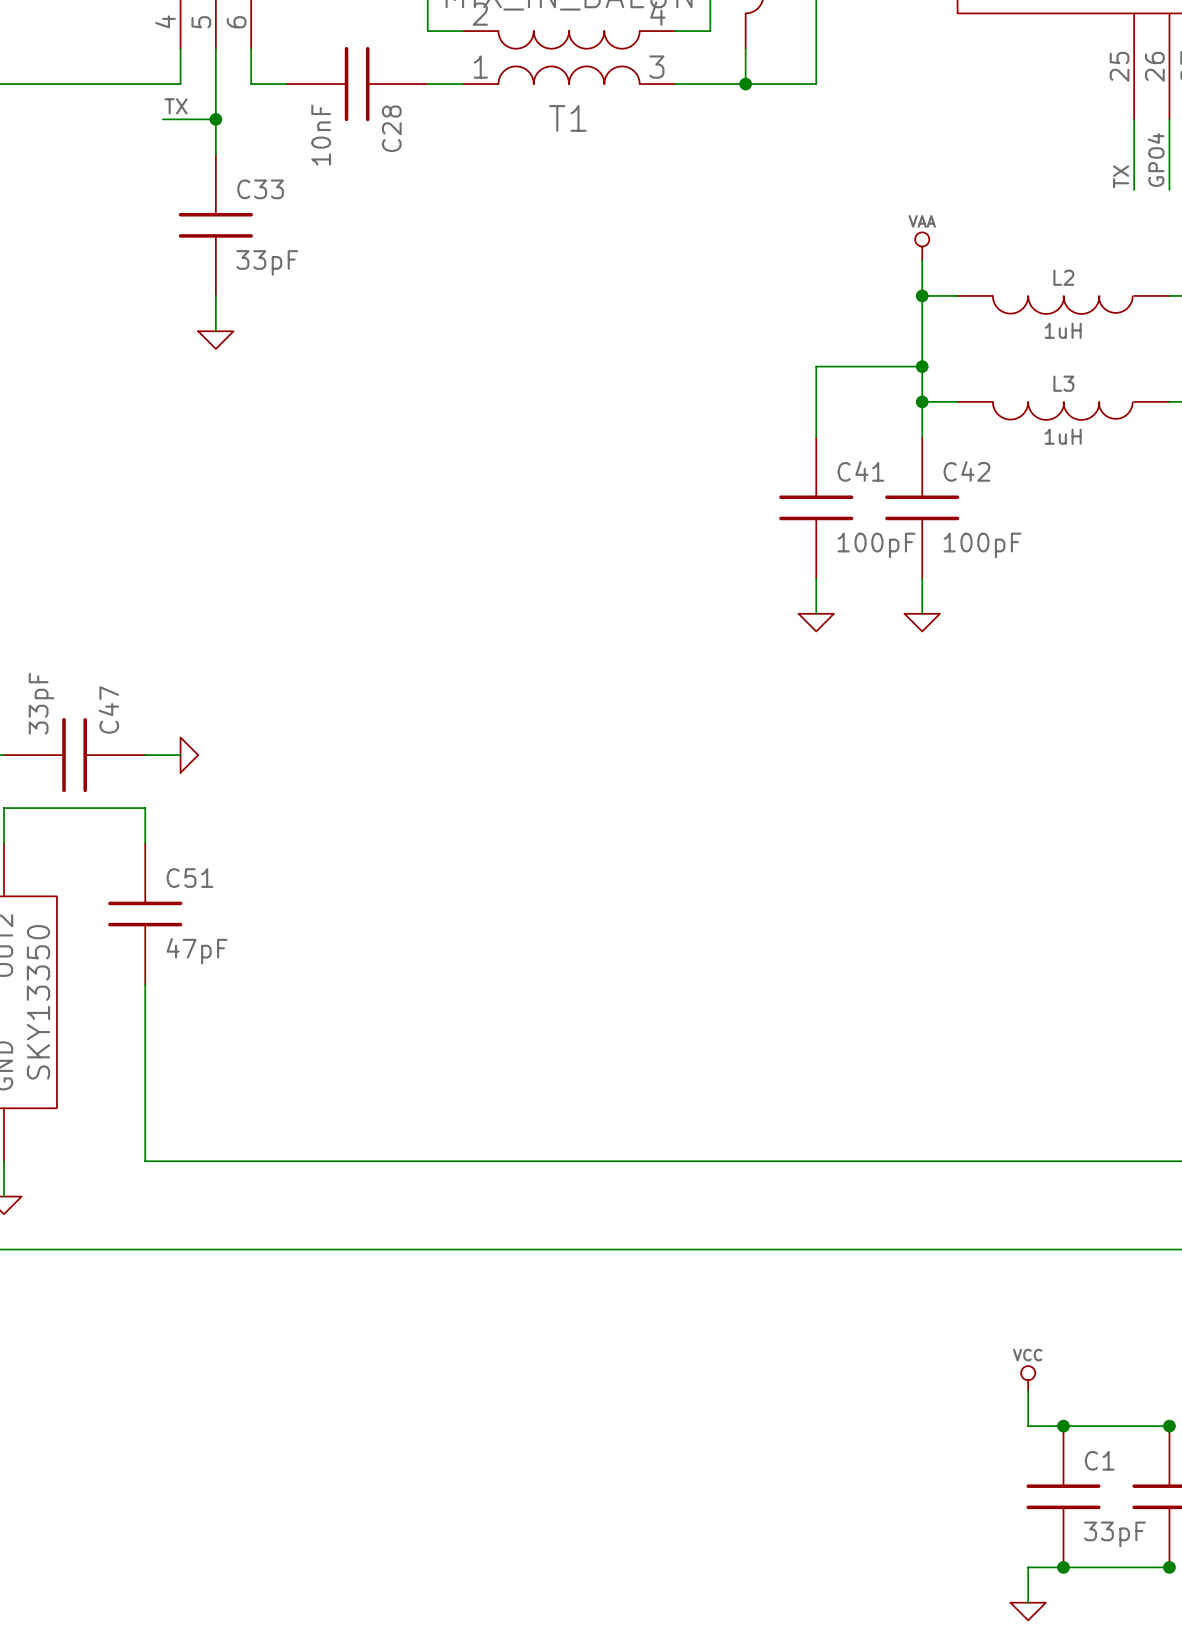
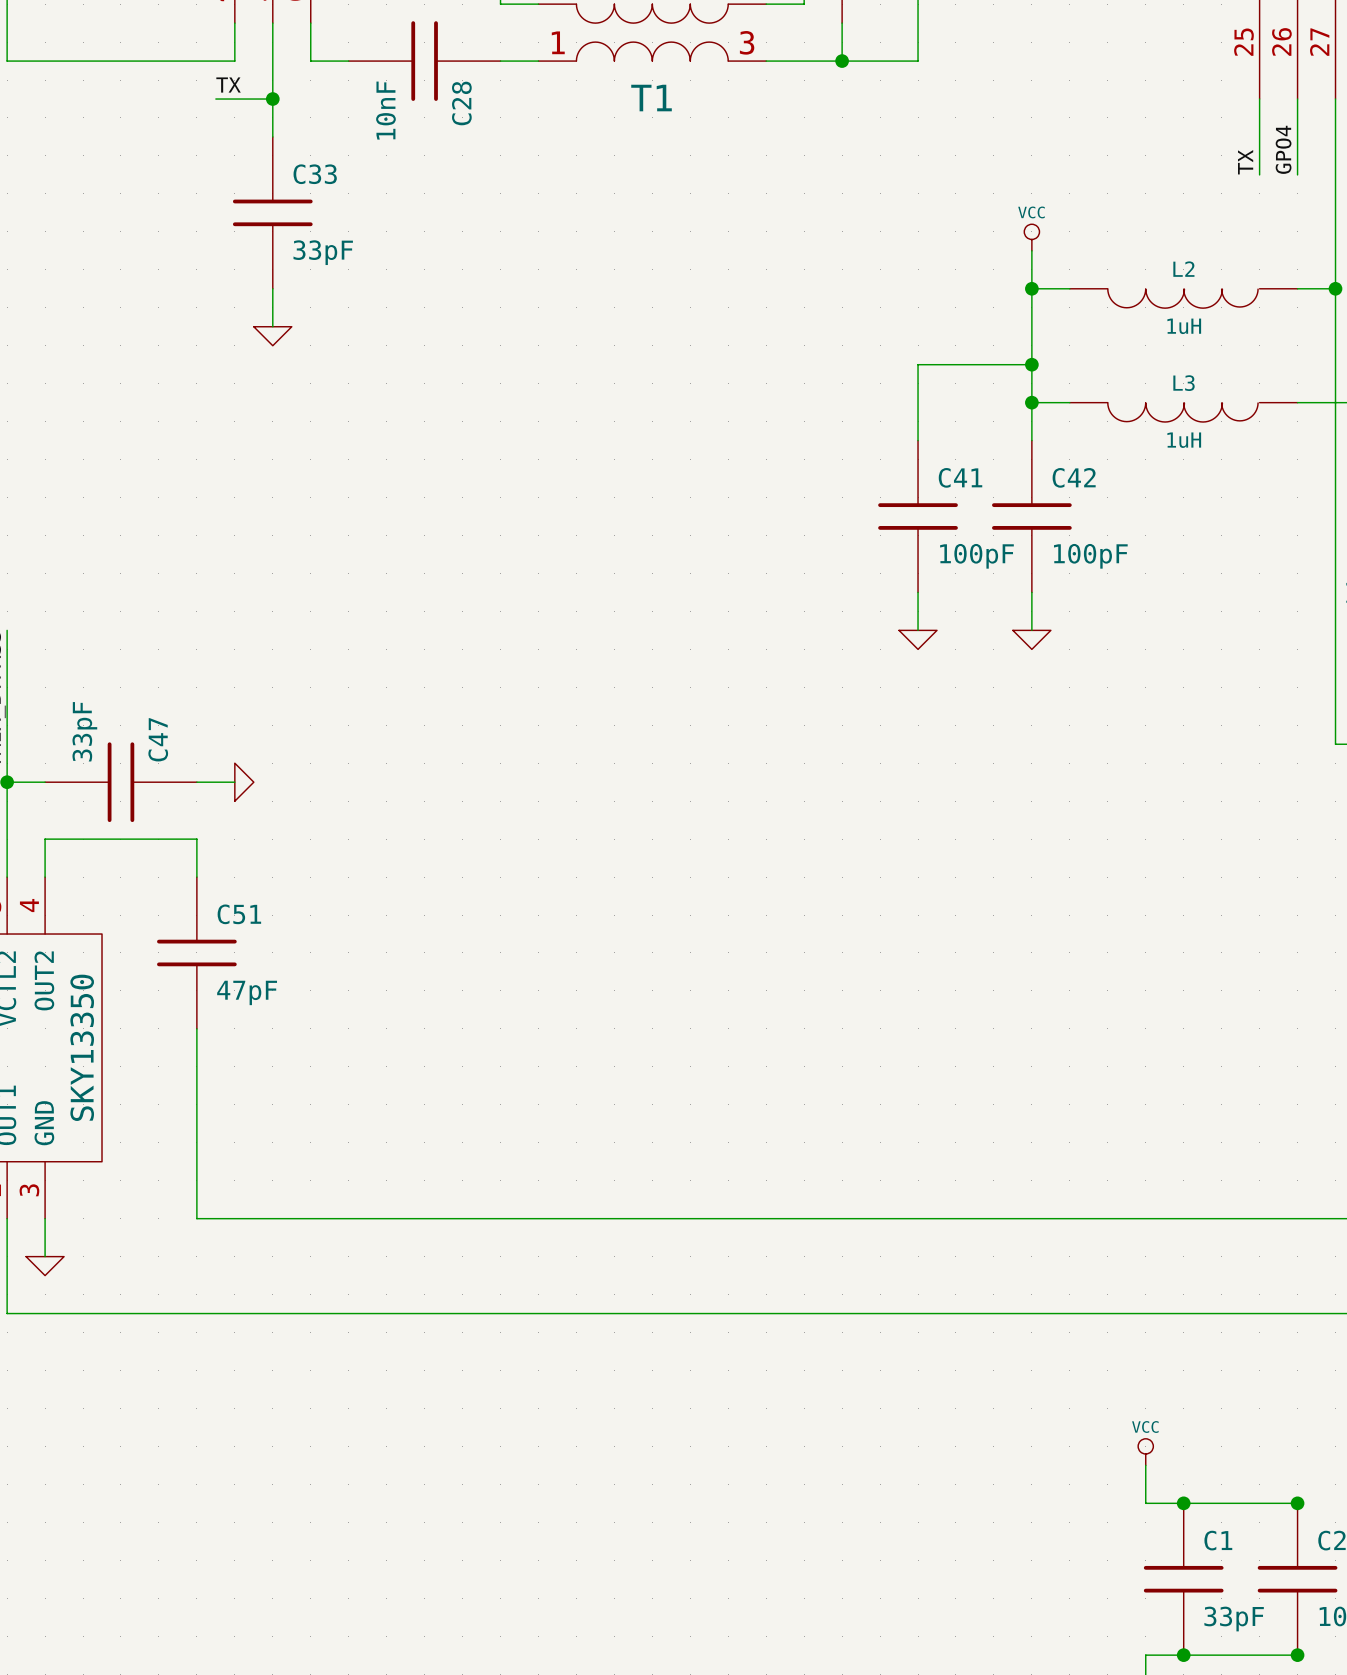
power symbol: VAA (922, 246) -> VCC (1031, 237)

